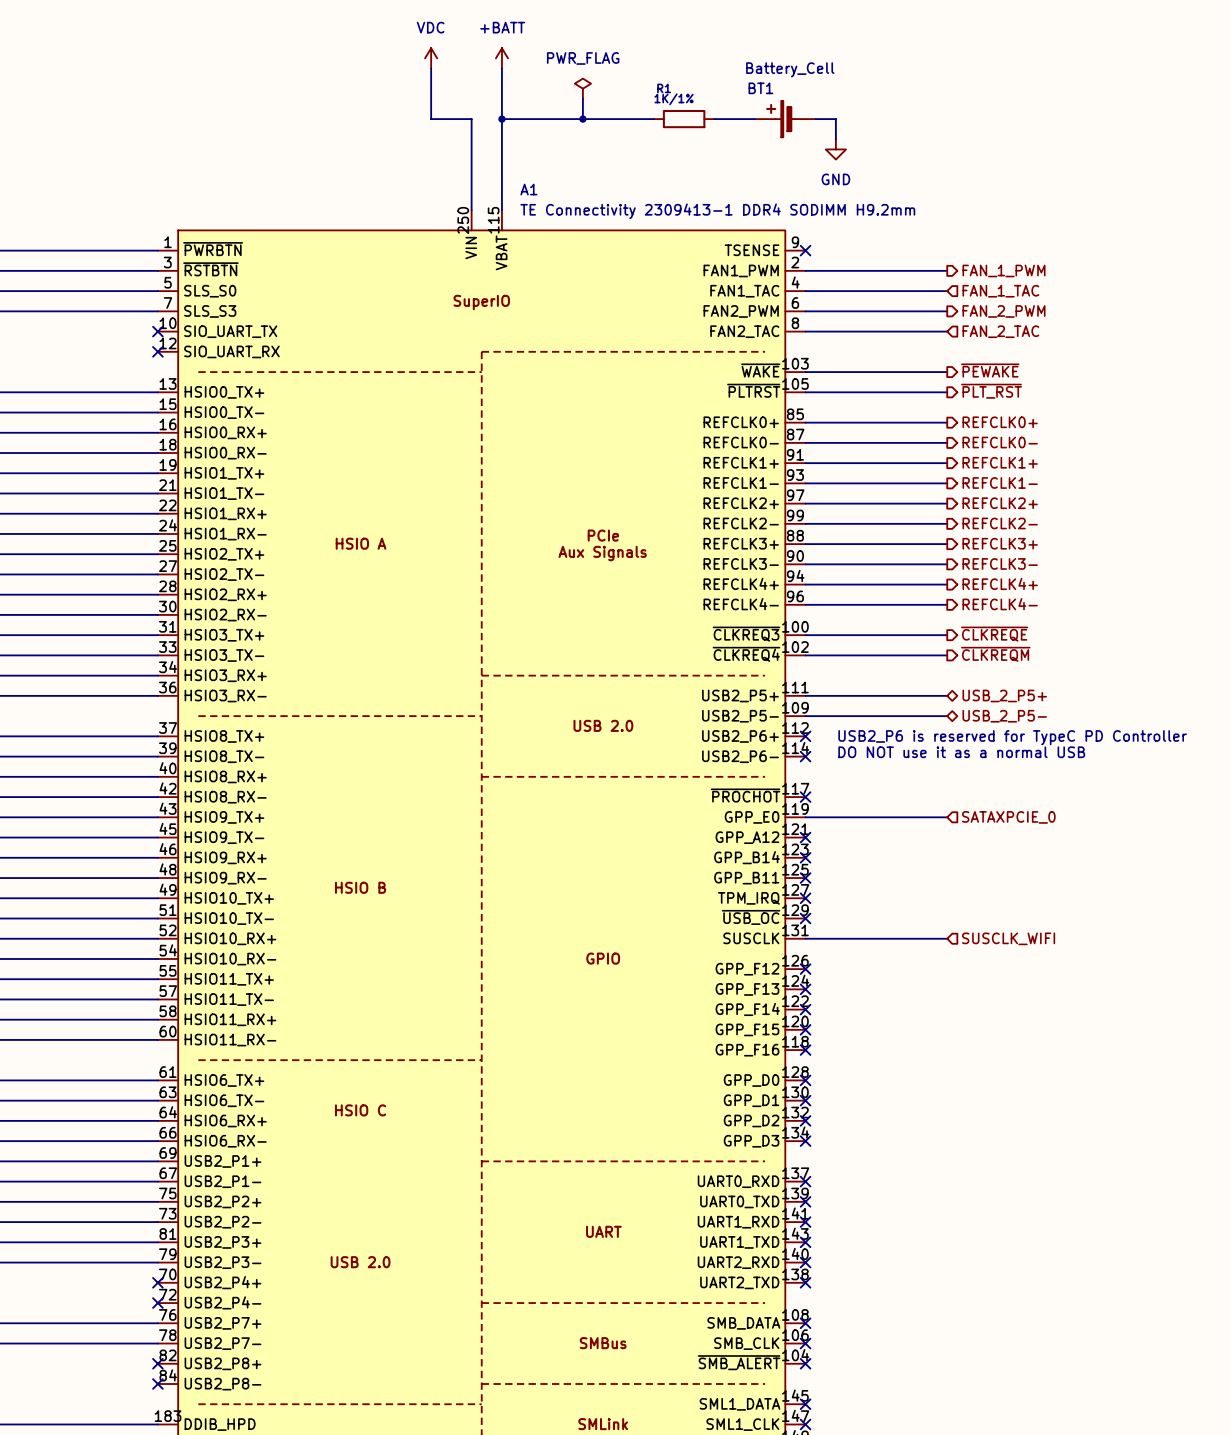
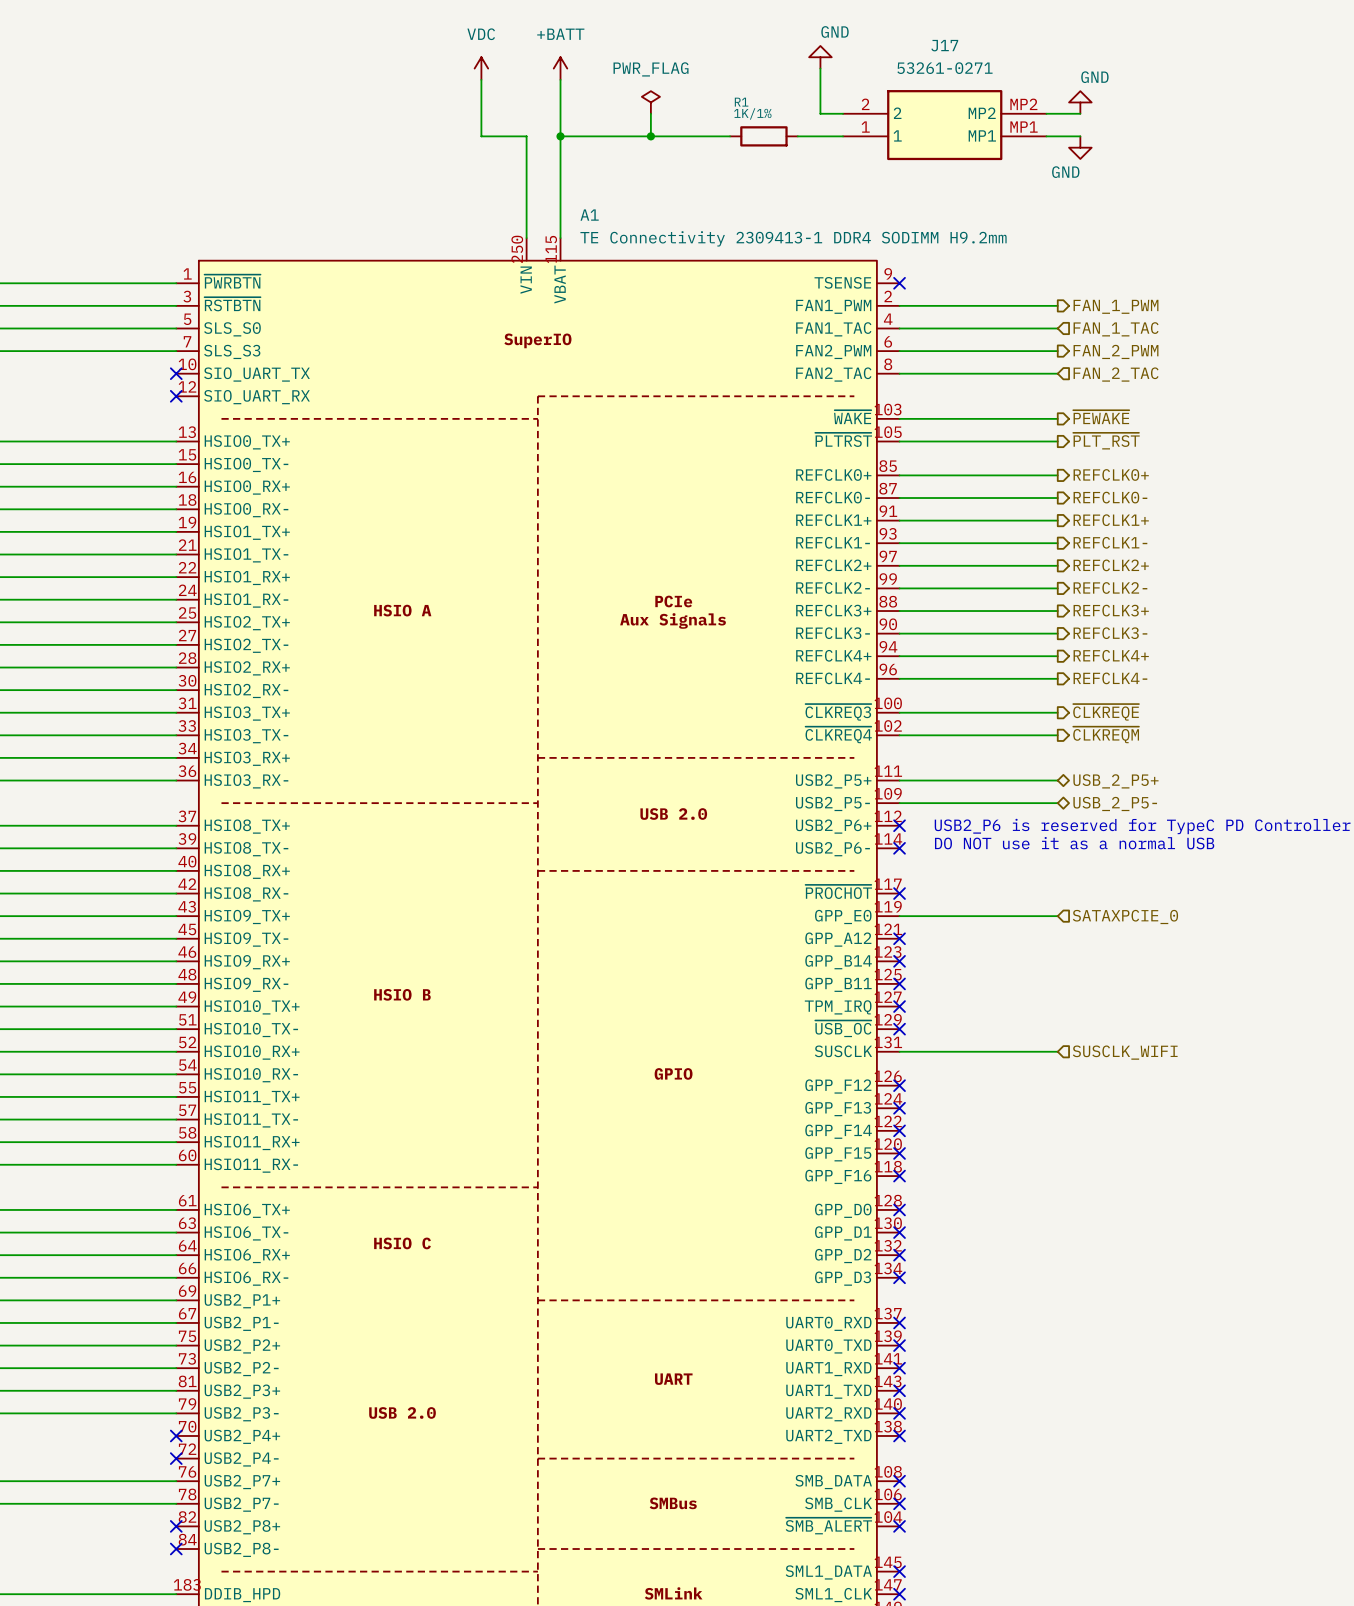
power symbol: none -> GND (820, 57)
wire: none -> (820, 68) (820, 113) (843, 113)
power symbol: none -> GND (1080, 102)
wire: none -> (1046, 113) (1080, 113)
J17: none -> 53261-0271 (944, 125)
BT1: Battery_Cell (785, 119) -> none
wire: none -> (1046, 136) (1080, 136)
power symbol: none -> GND (1080, 147)
power symbol: GND (835, 149) -> none

